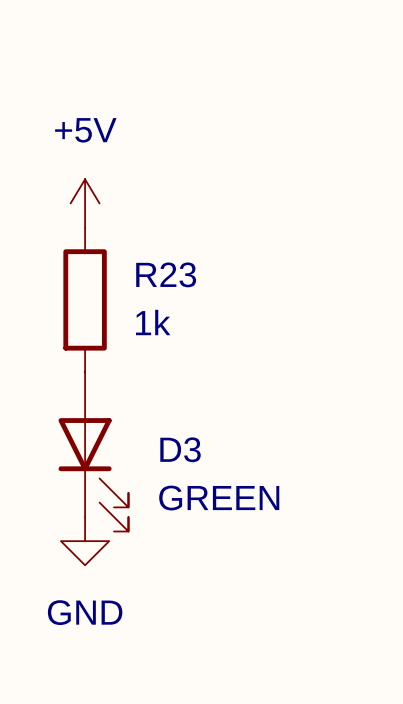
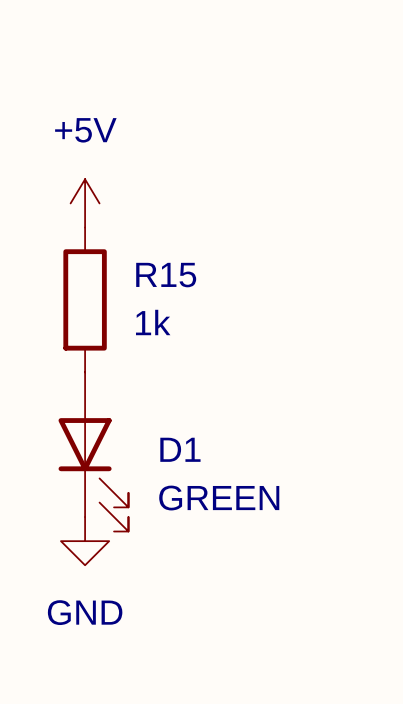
R23 name: R23 (166, 274) -> R15 (166, 275)
D3 name: D3 (180, 449) -> D1 (180, 449)

